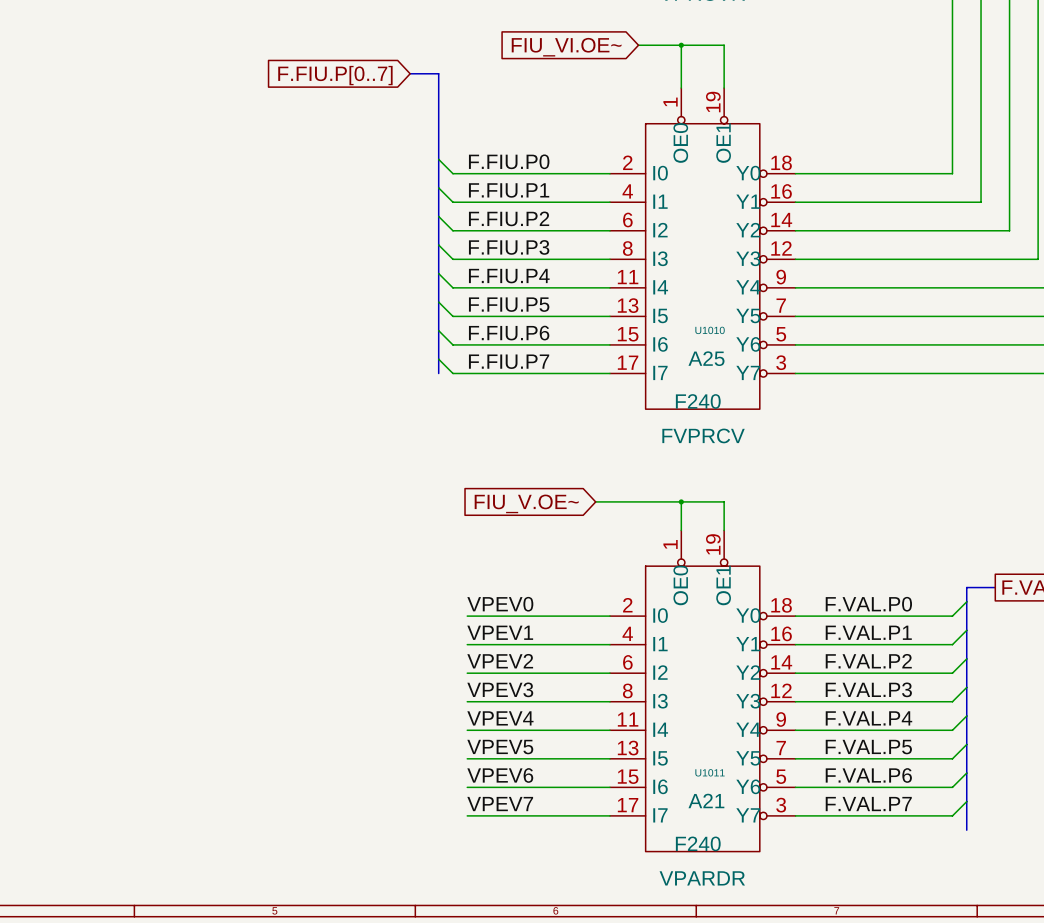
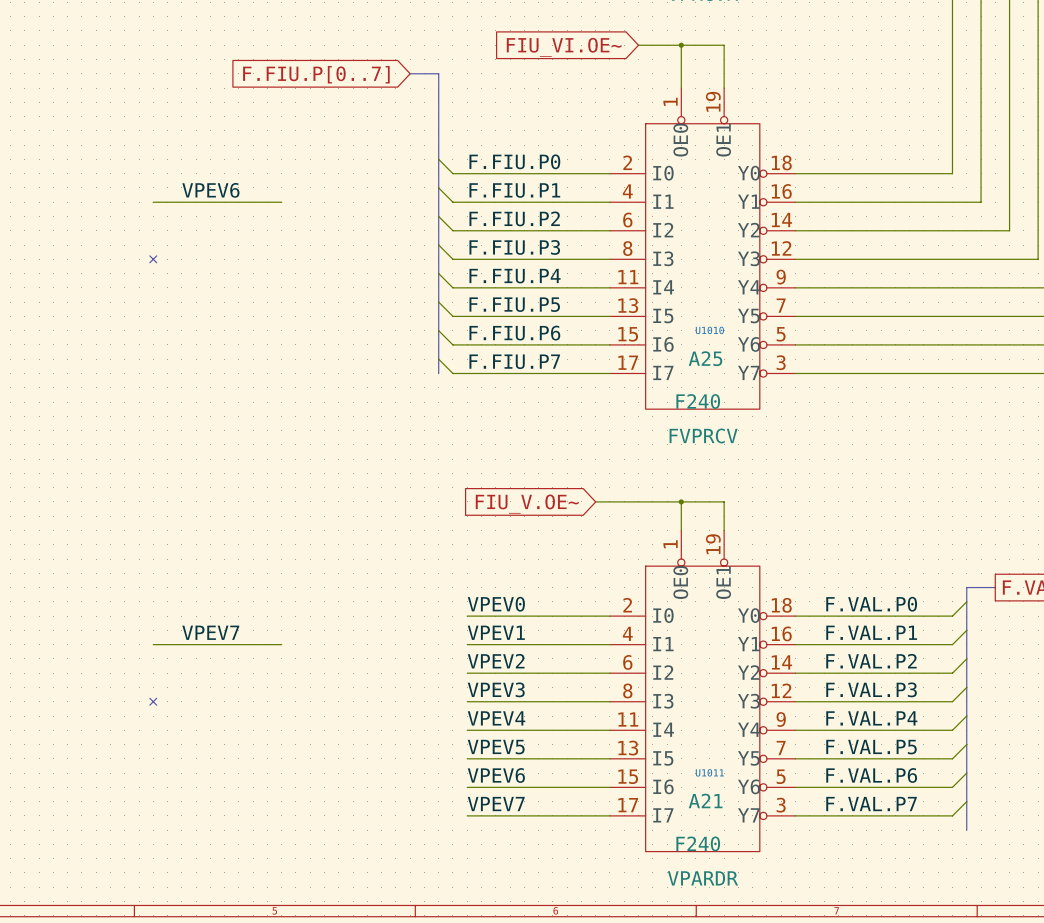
label: none -> VPEV6 (210, 190)
wire: none -> (153, 202) (281, 202)
no-connect mark: none -> (153, 259)
label: none -> VPEV7 (210, 632)
wire: none -> (153, 644) (281, 644)
no-connect mark: none -> (153, 701)

